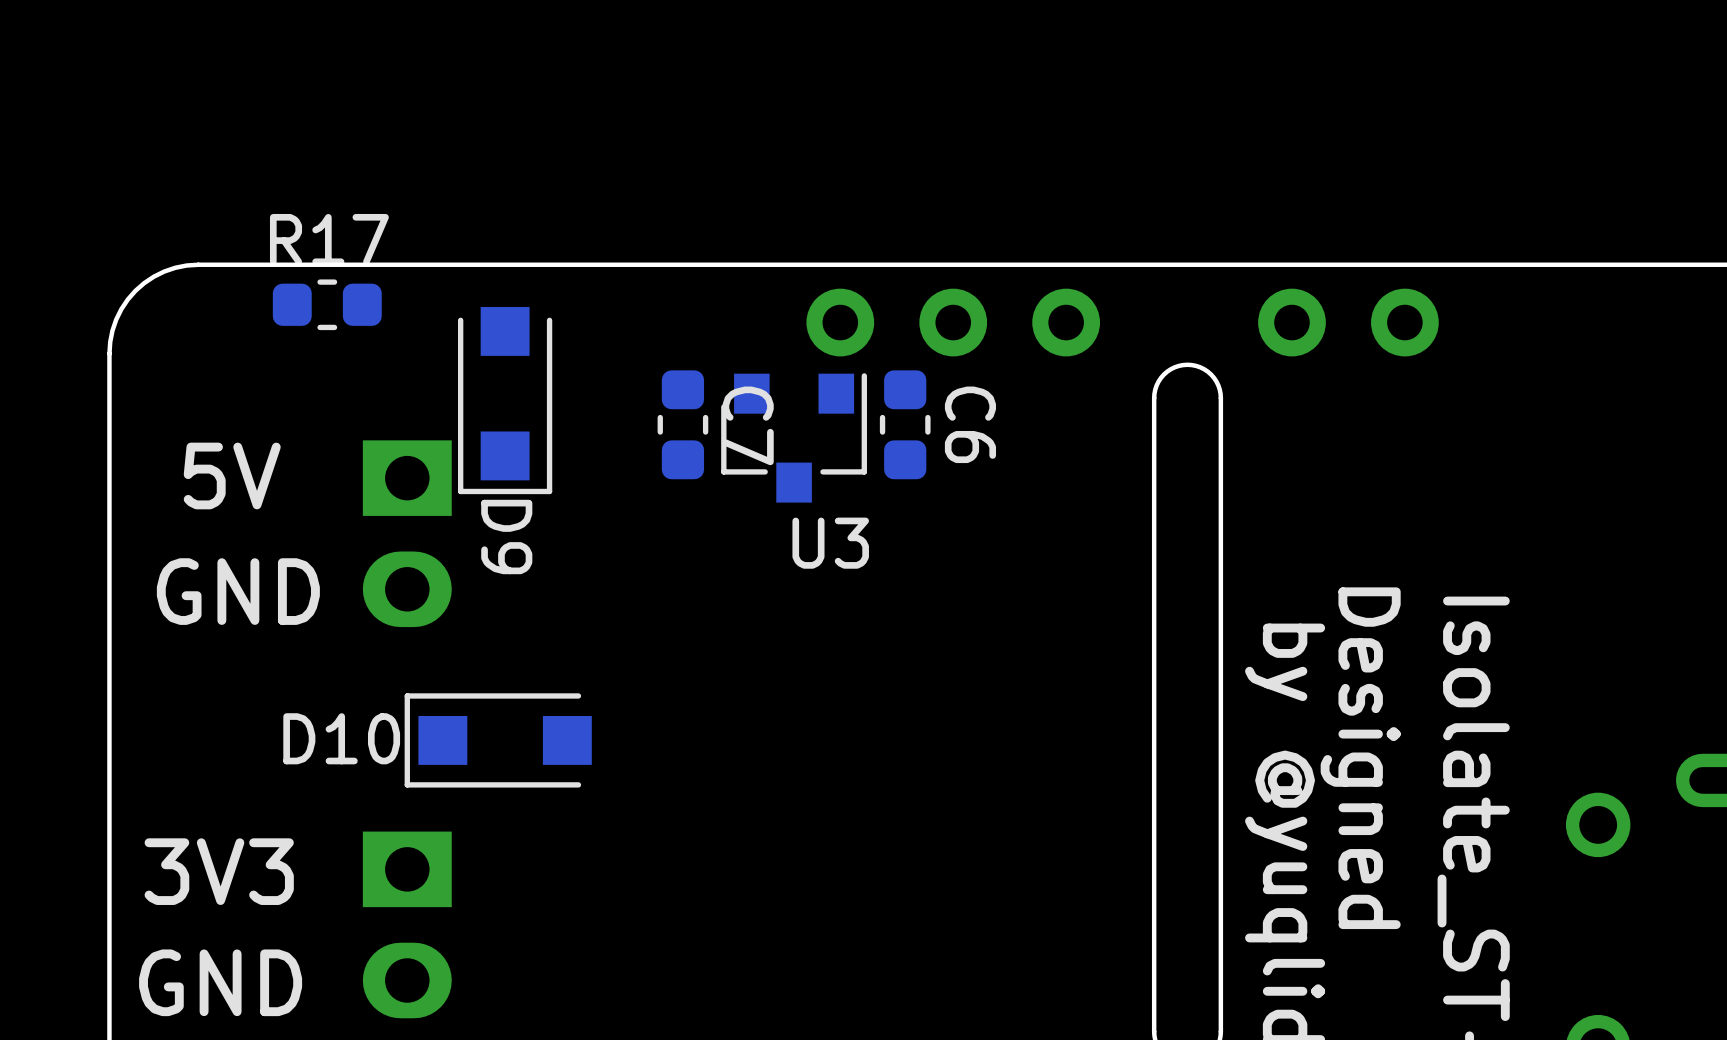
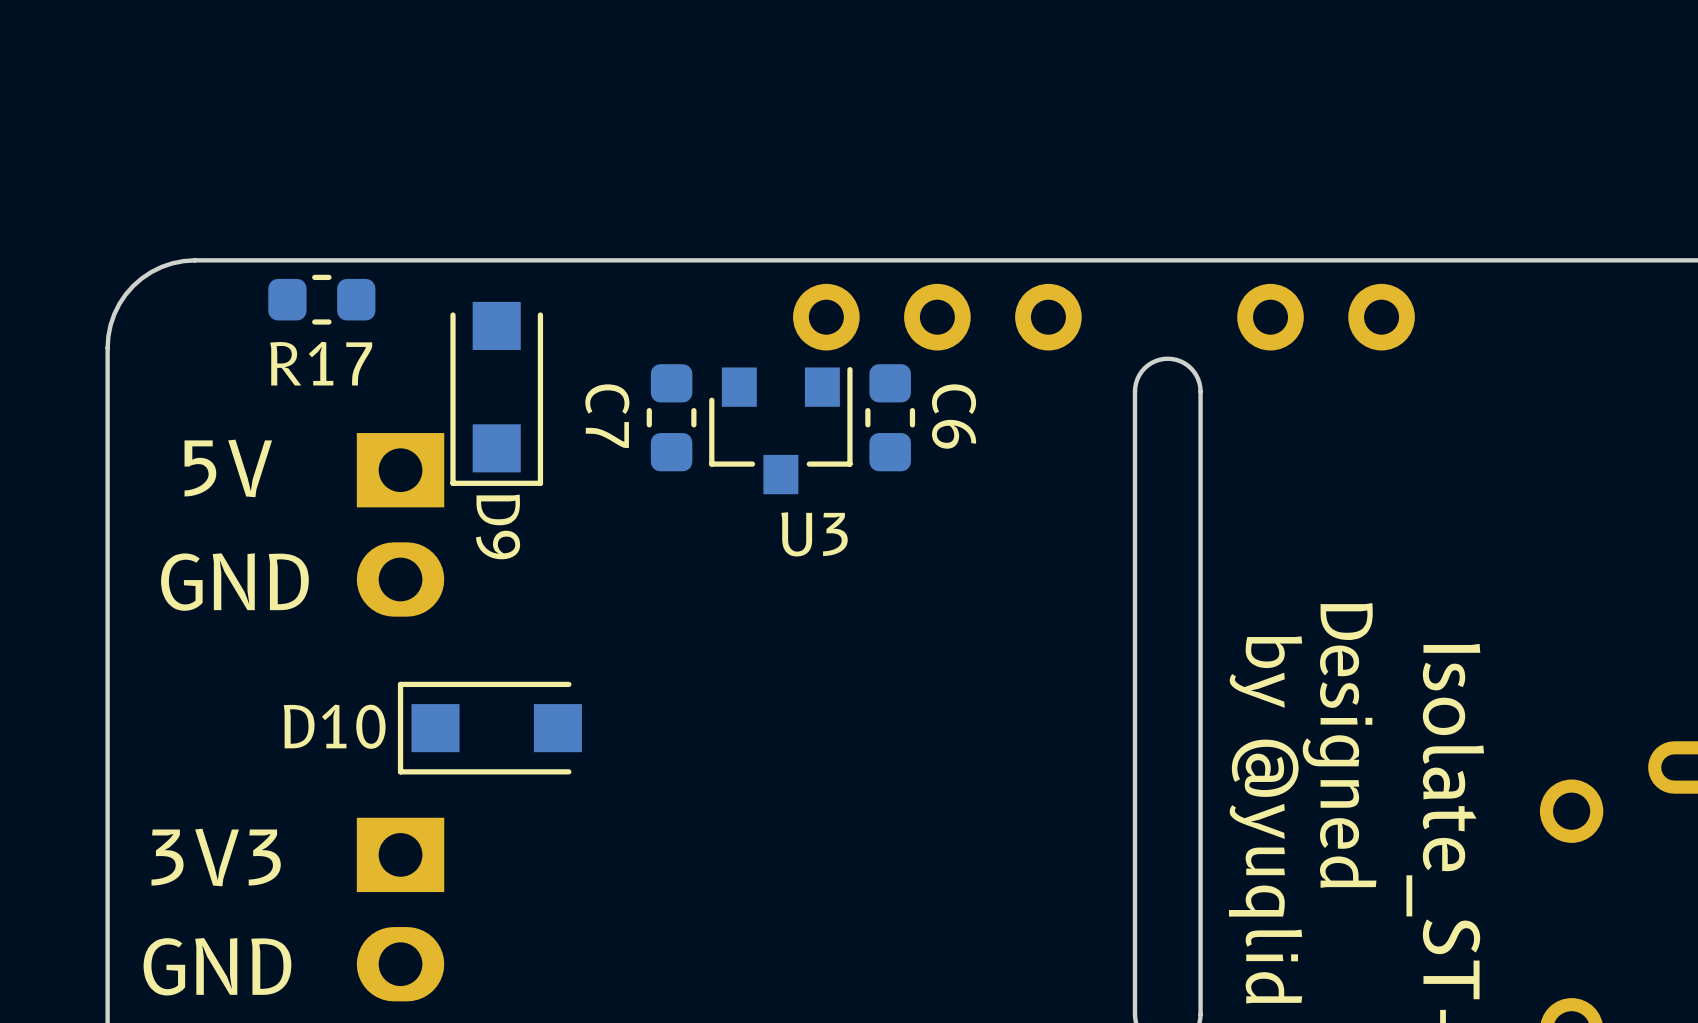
R17 name position: R17 (329, 239) -> R17 (321, 363)
C7 name position: C7 (748, 425) -> C7 (607, 416)

